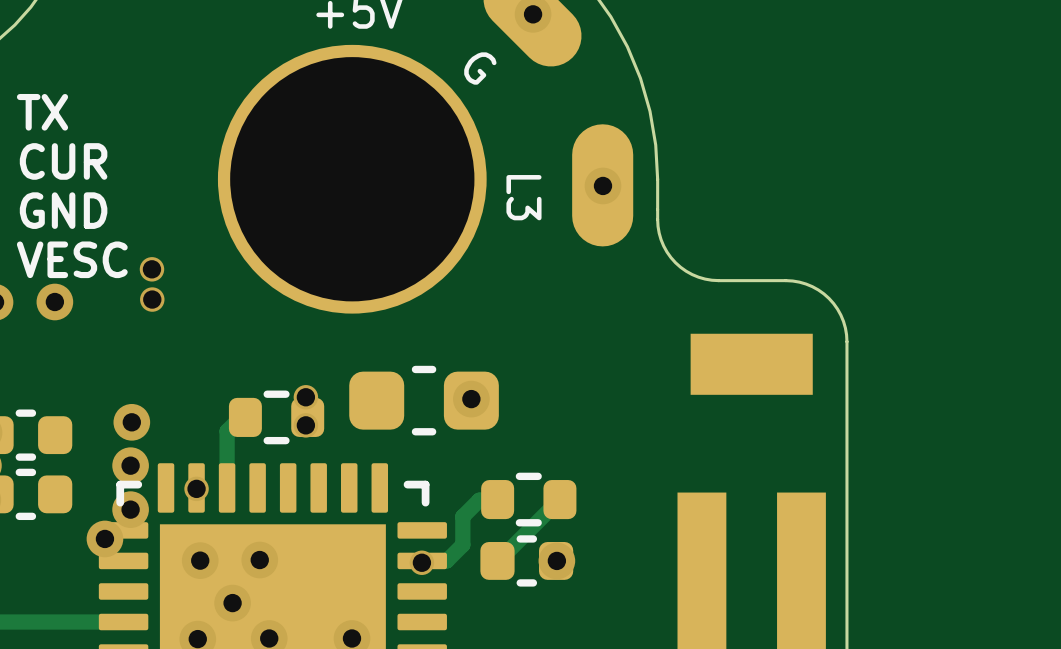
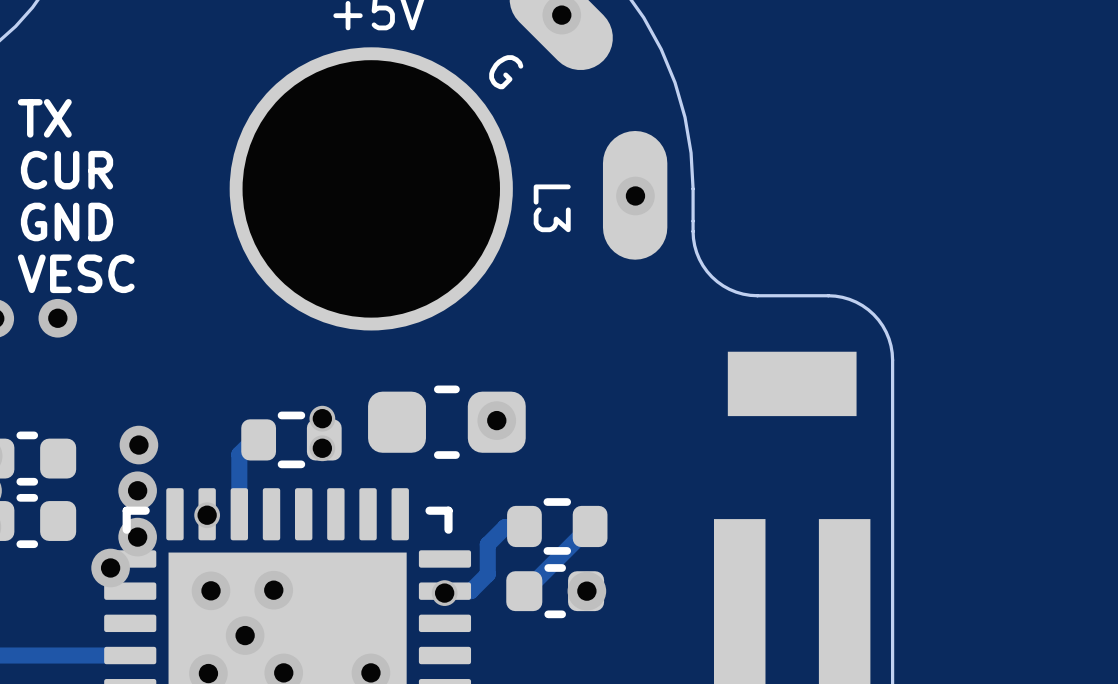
via: (151, 269) -> none
via: (152, 299) -> none

